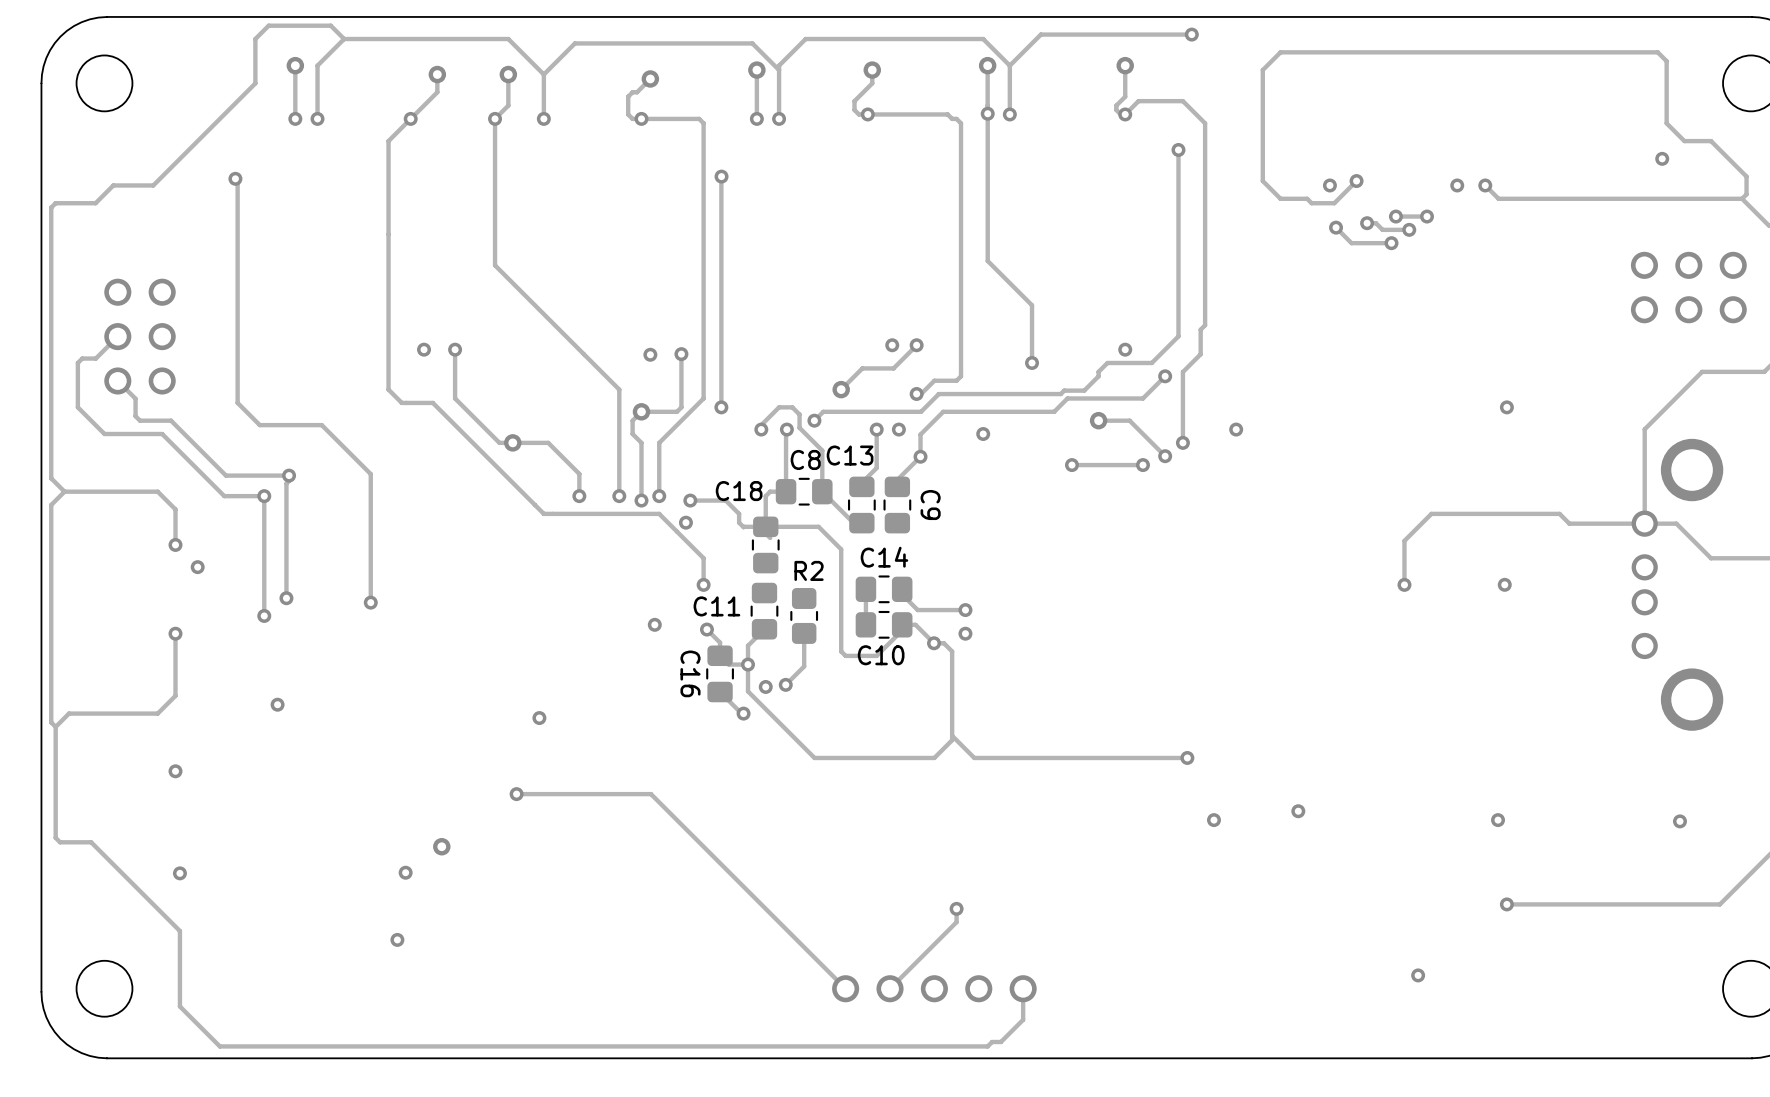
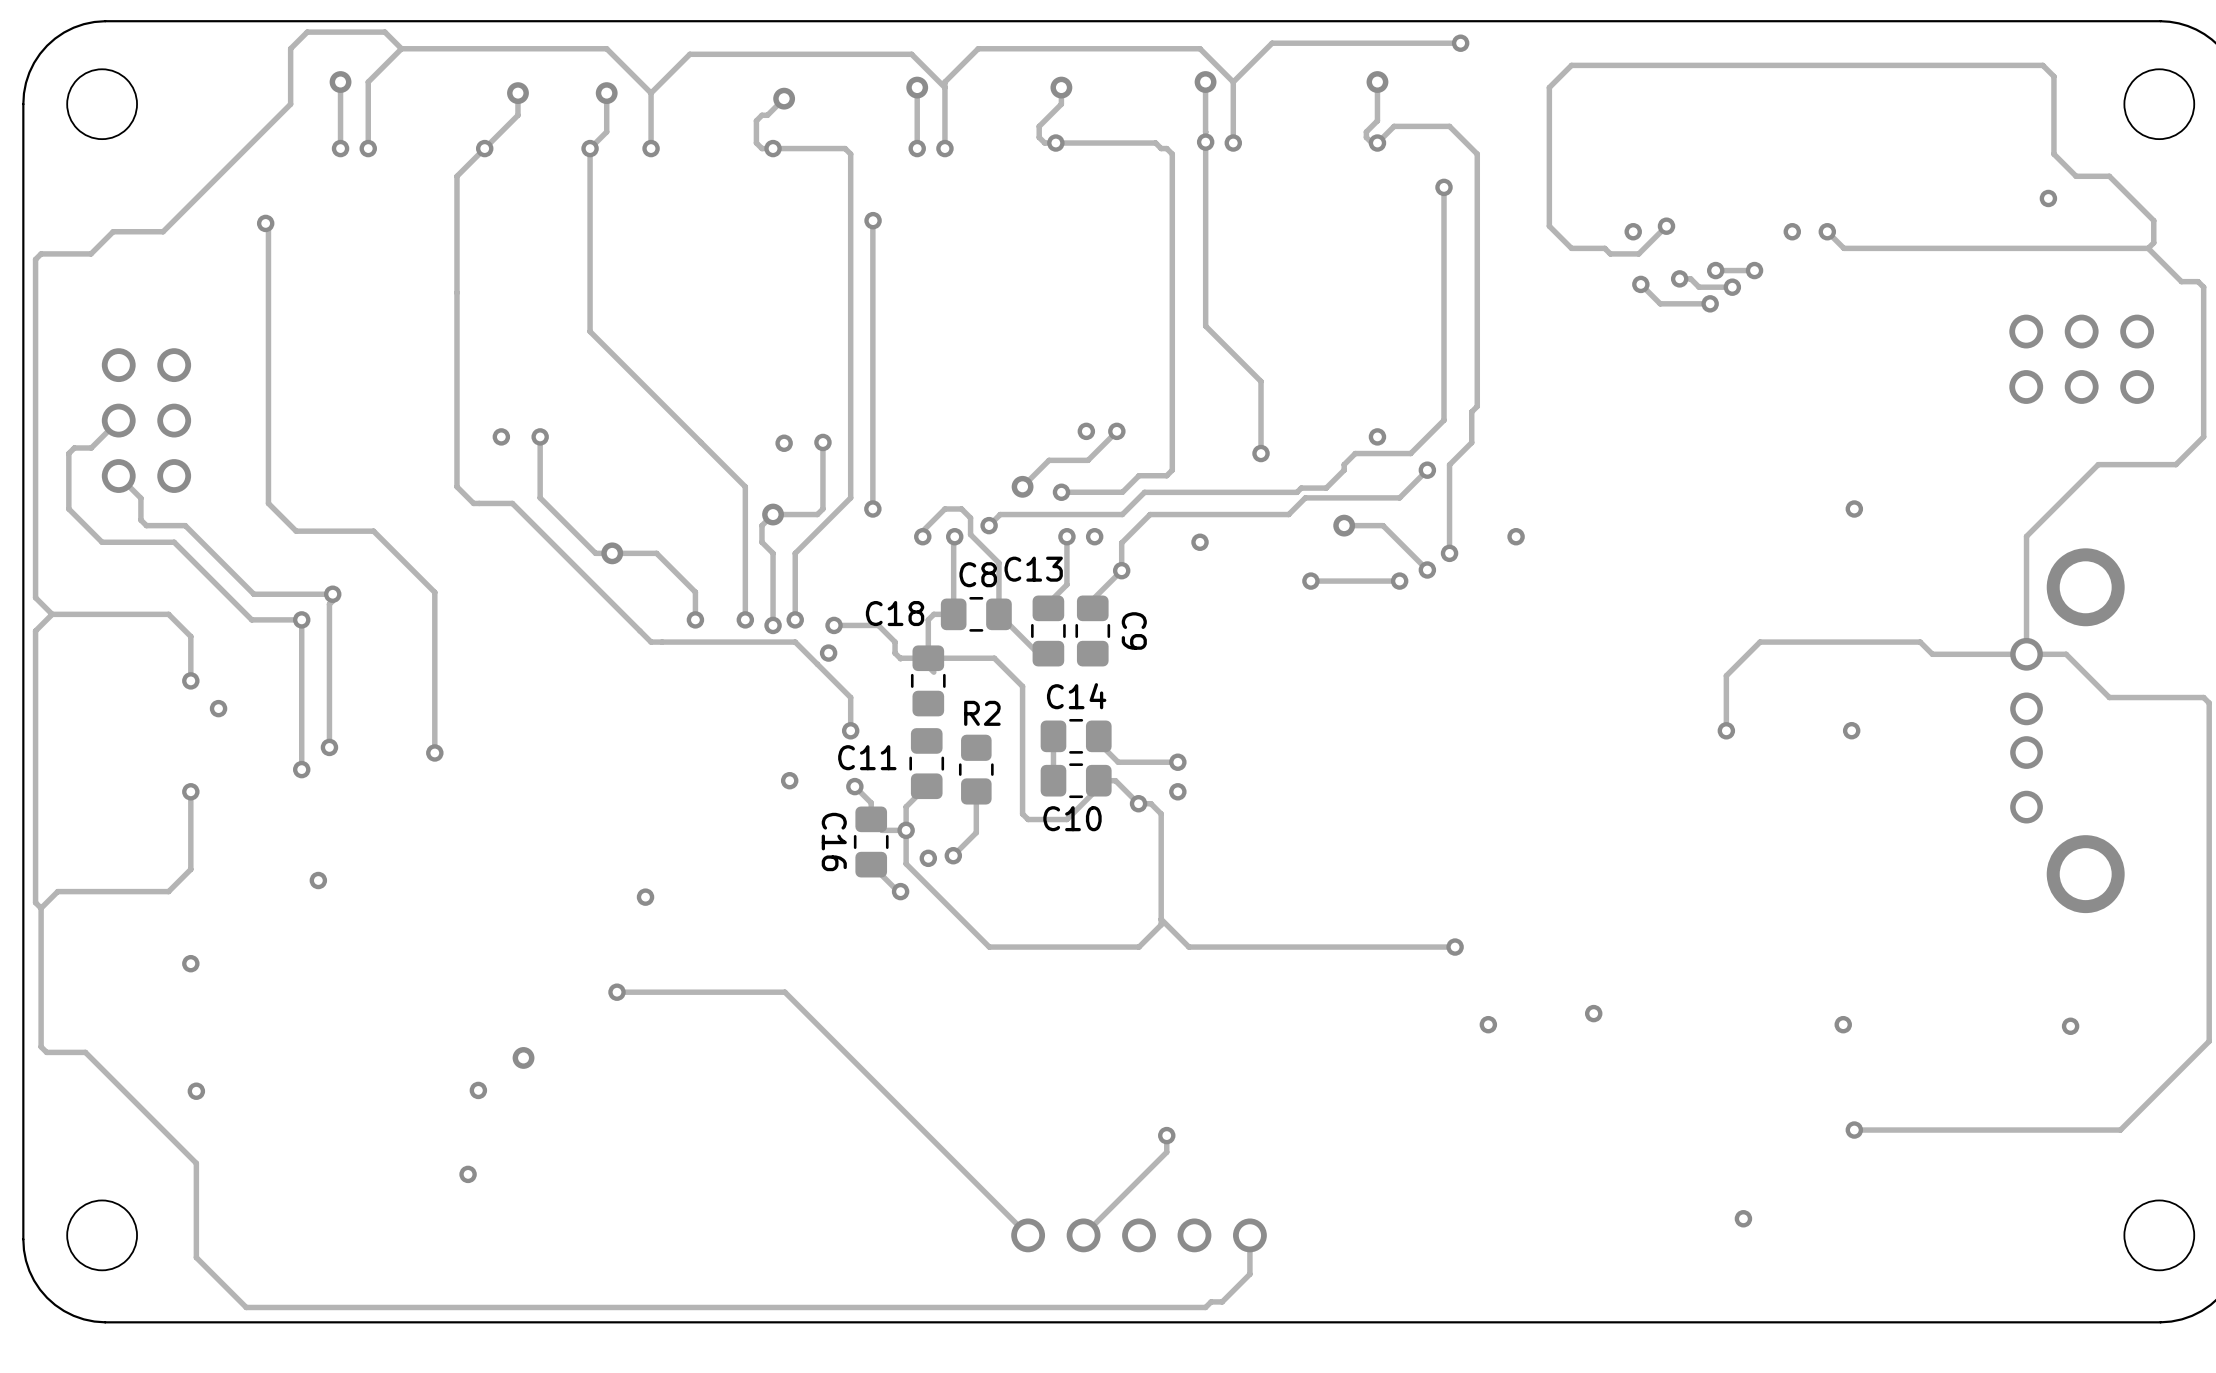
track: none -> (1116, 492) (1061, 492)
via position: (916, 393) -> (1061, 492)

